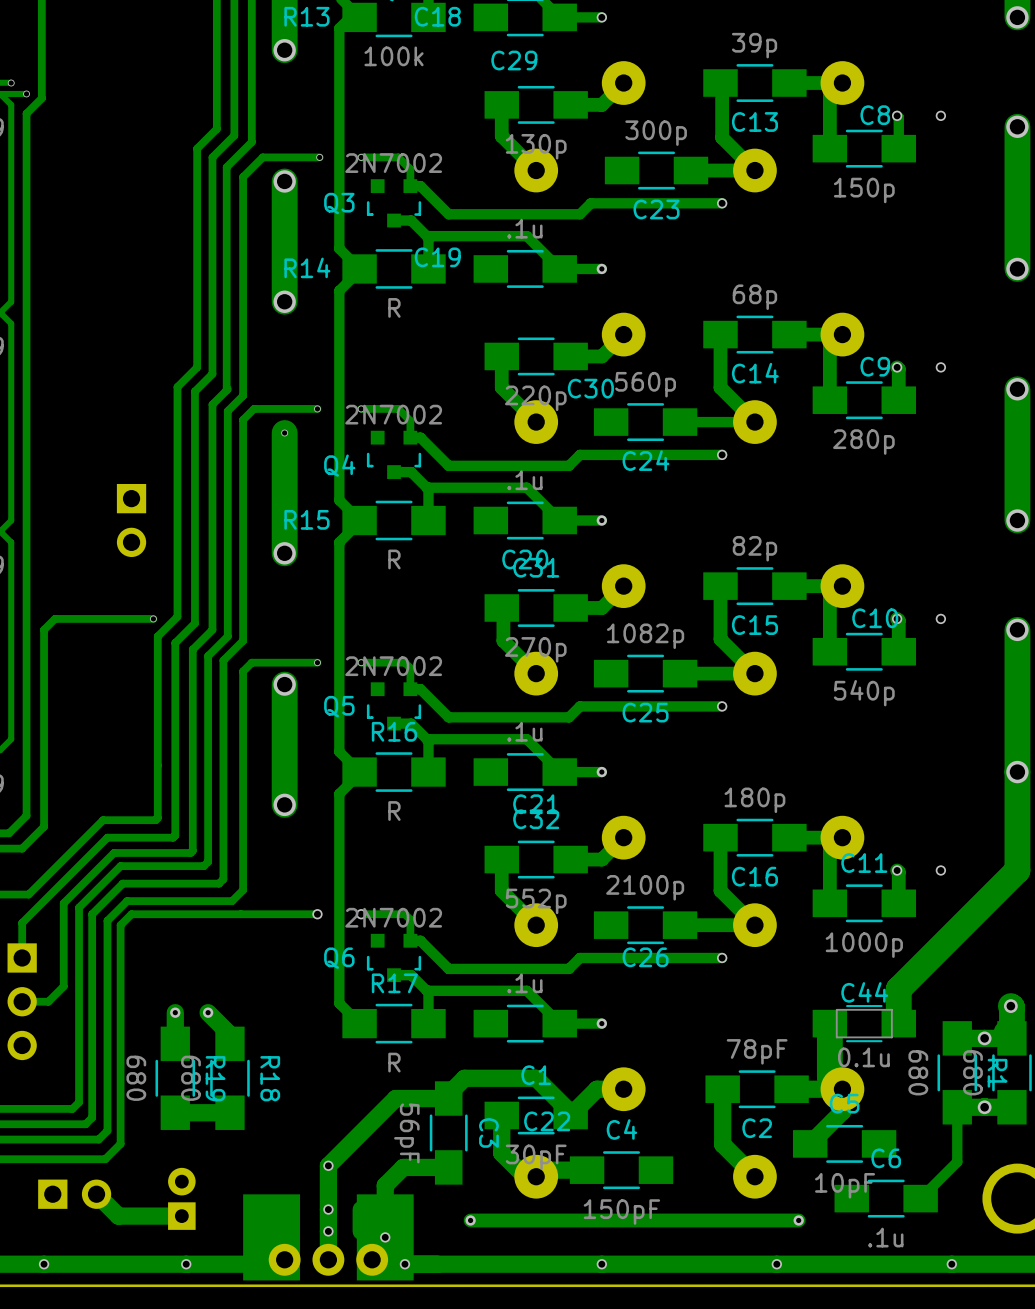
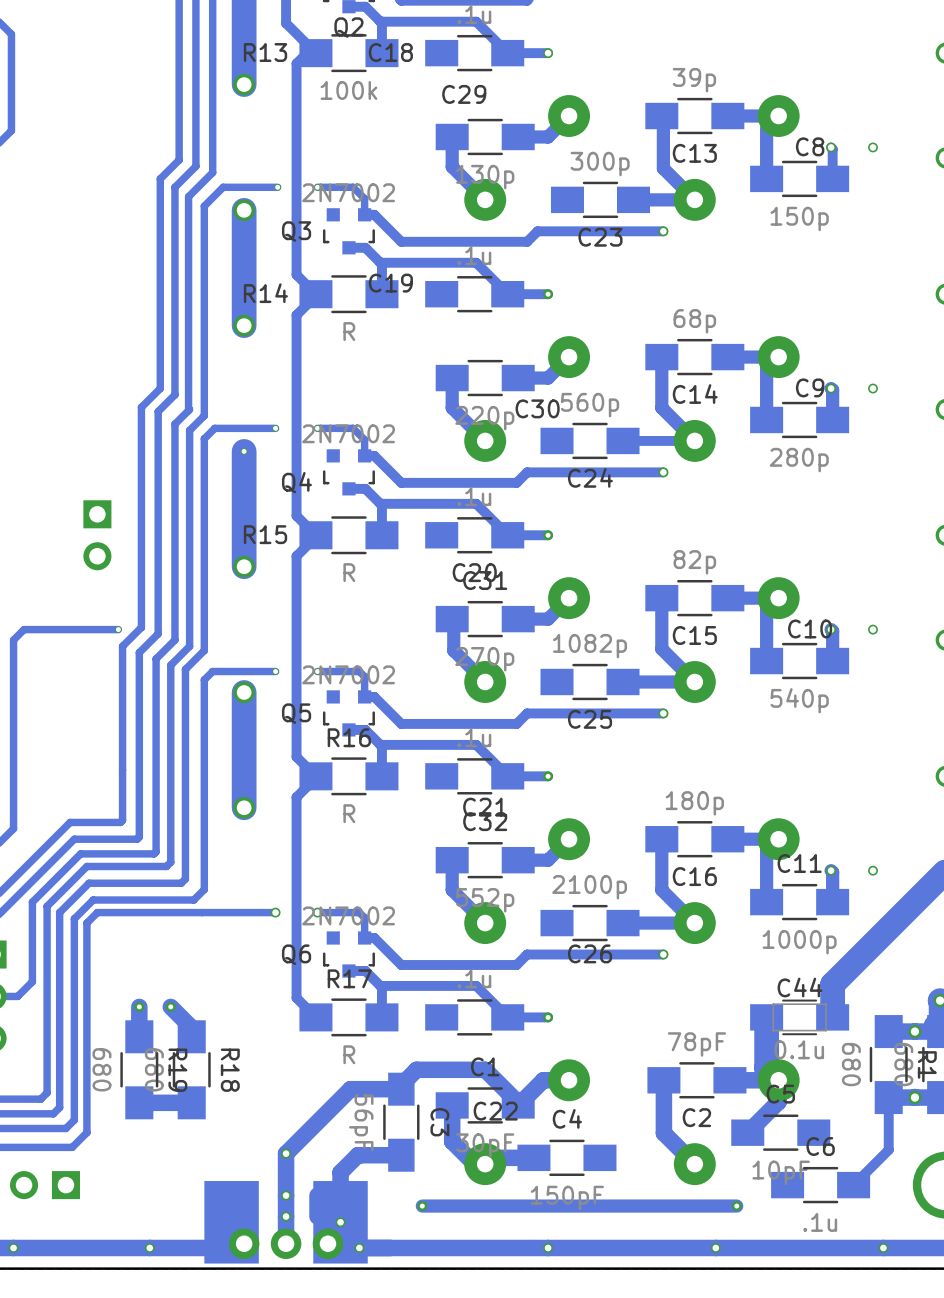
part rotation: 0° (74, 1194) -> 180° (44, 1185)
track: (96, 1194) (118, 1216) (181, 1216) -> none
part: (181, 1198) -> none

